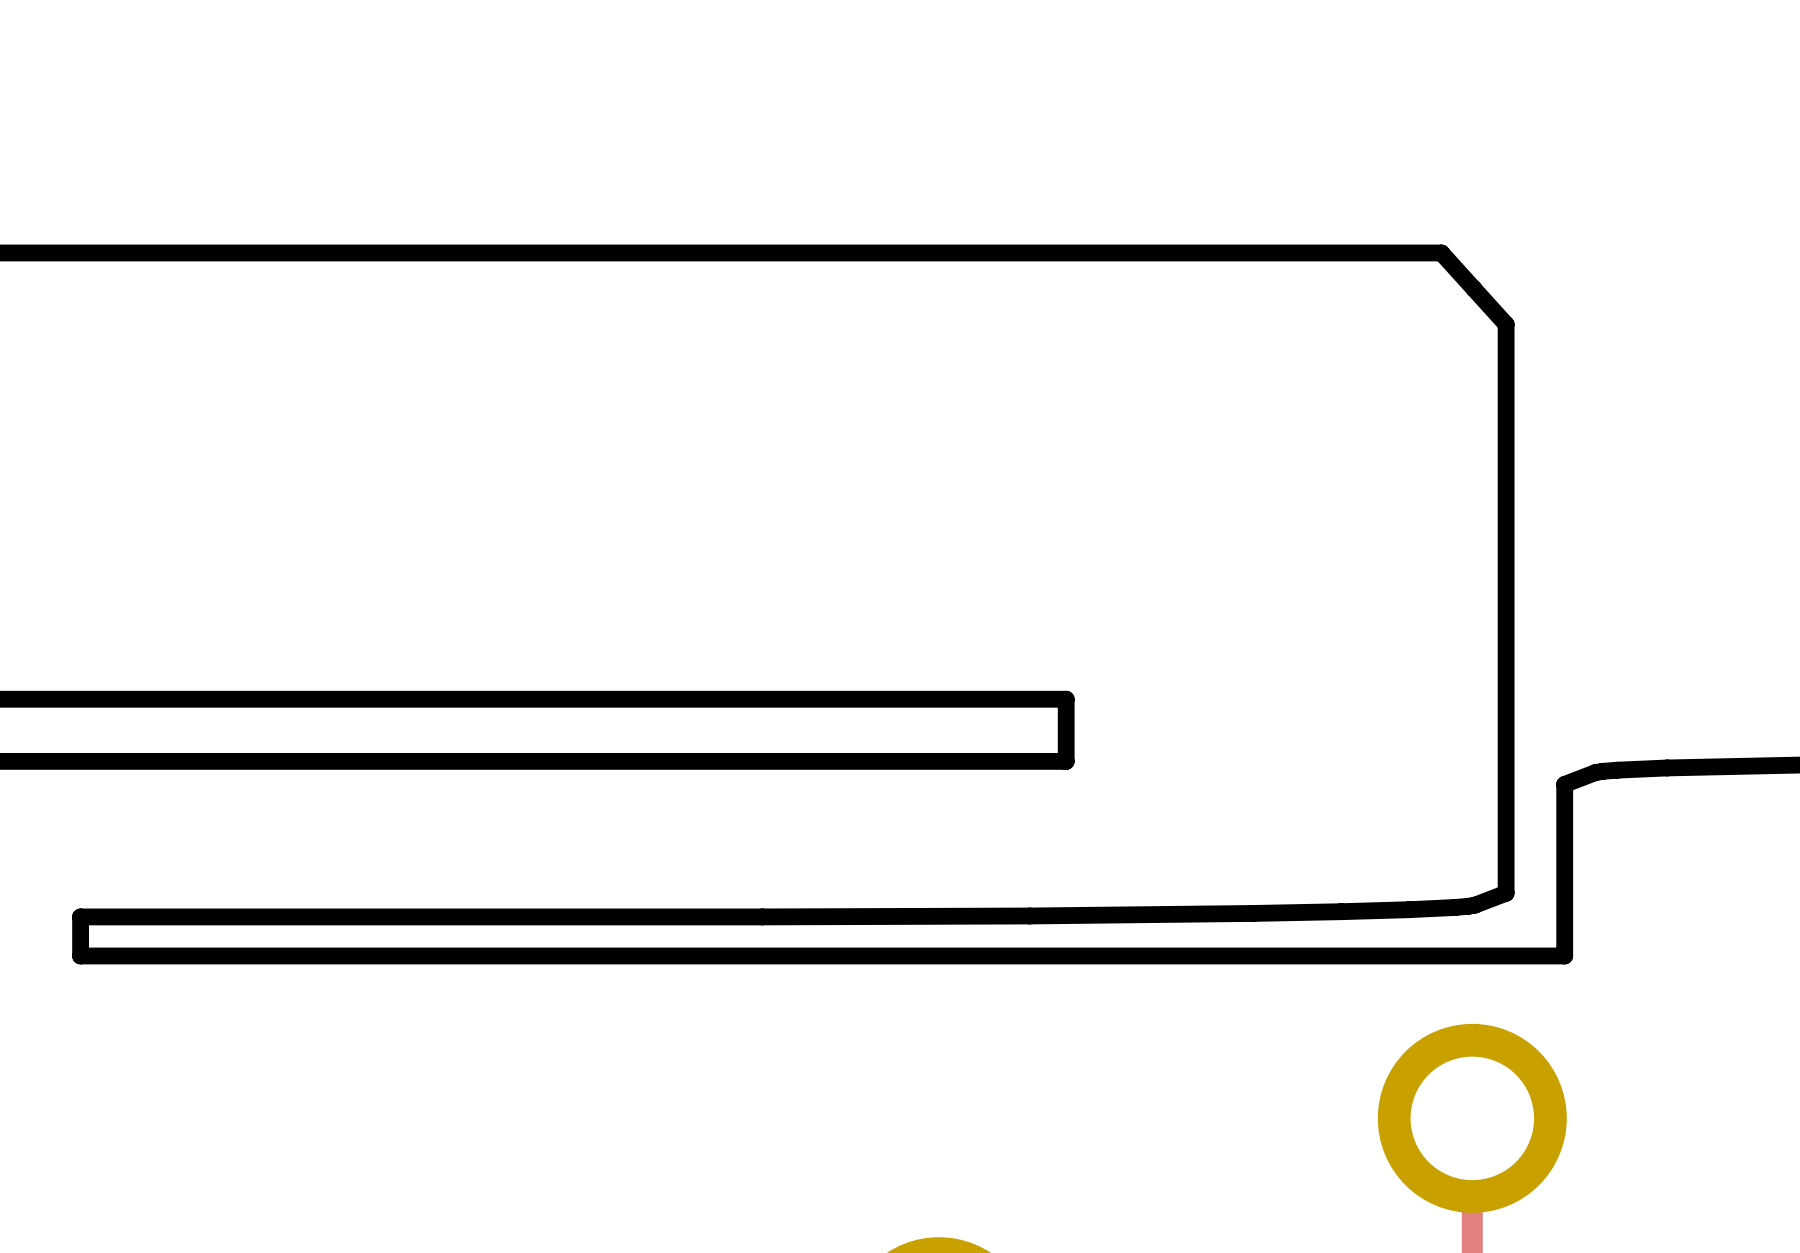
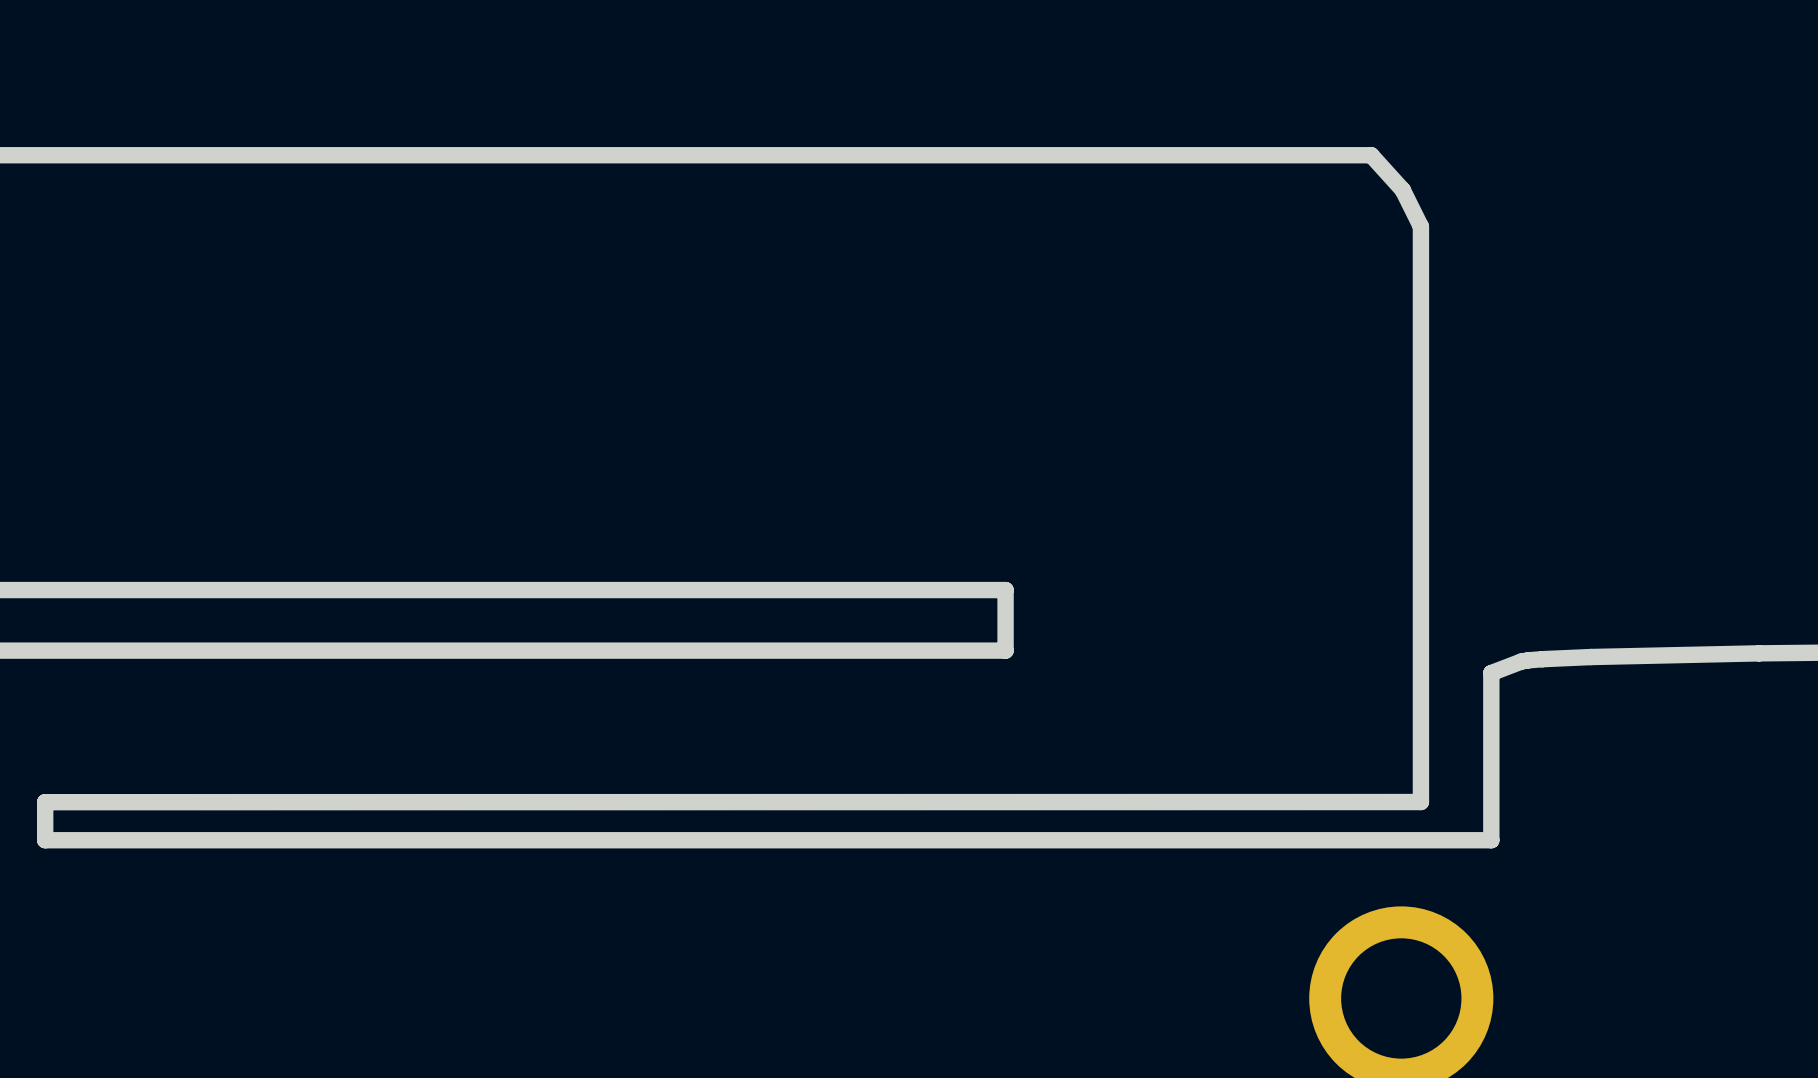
board edge: (1473, 288) (1506, 324) (1506, 893) (1475, 905) (1455, 907) (1253, 913) (762, 916) (80, 916) -> (1402, 190) (1420, 226) (1420, 802) (45, 802)

